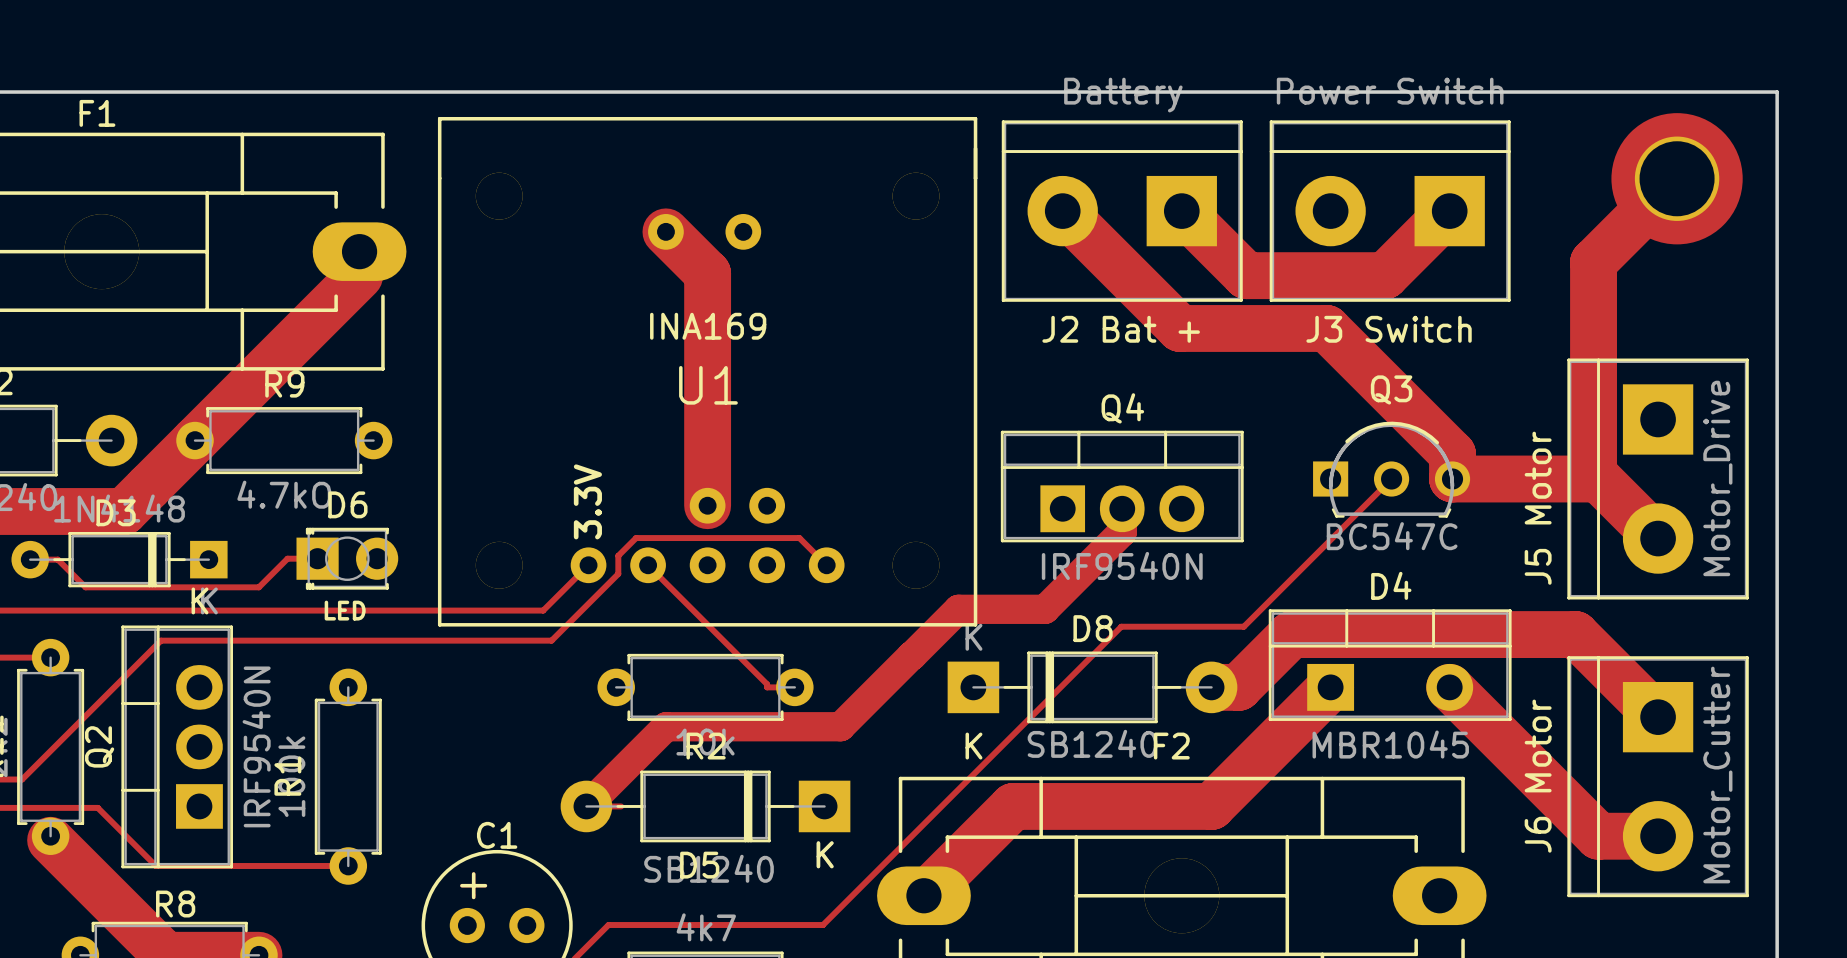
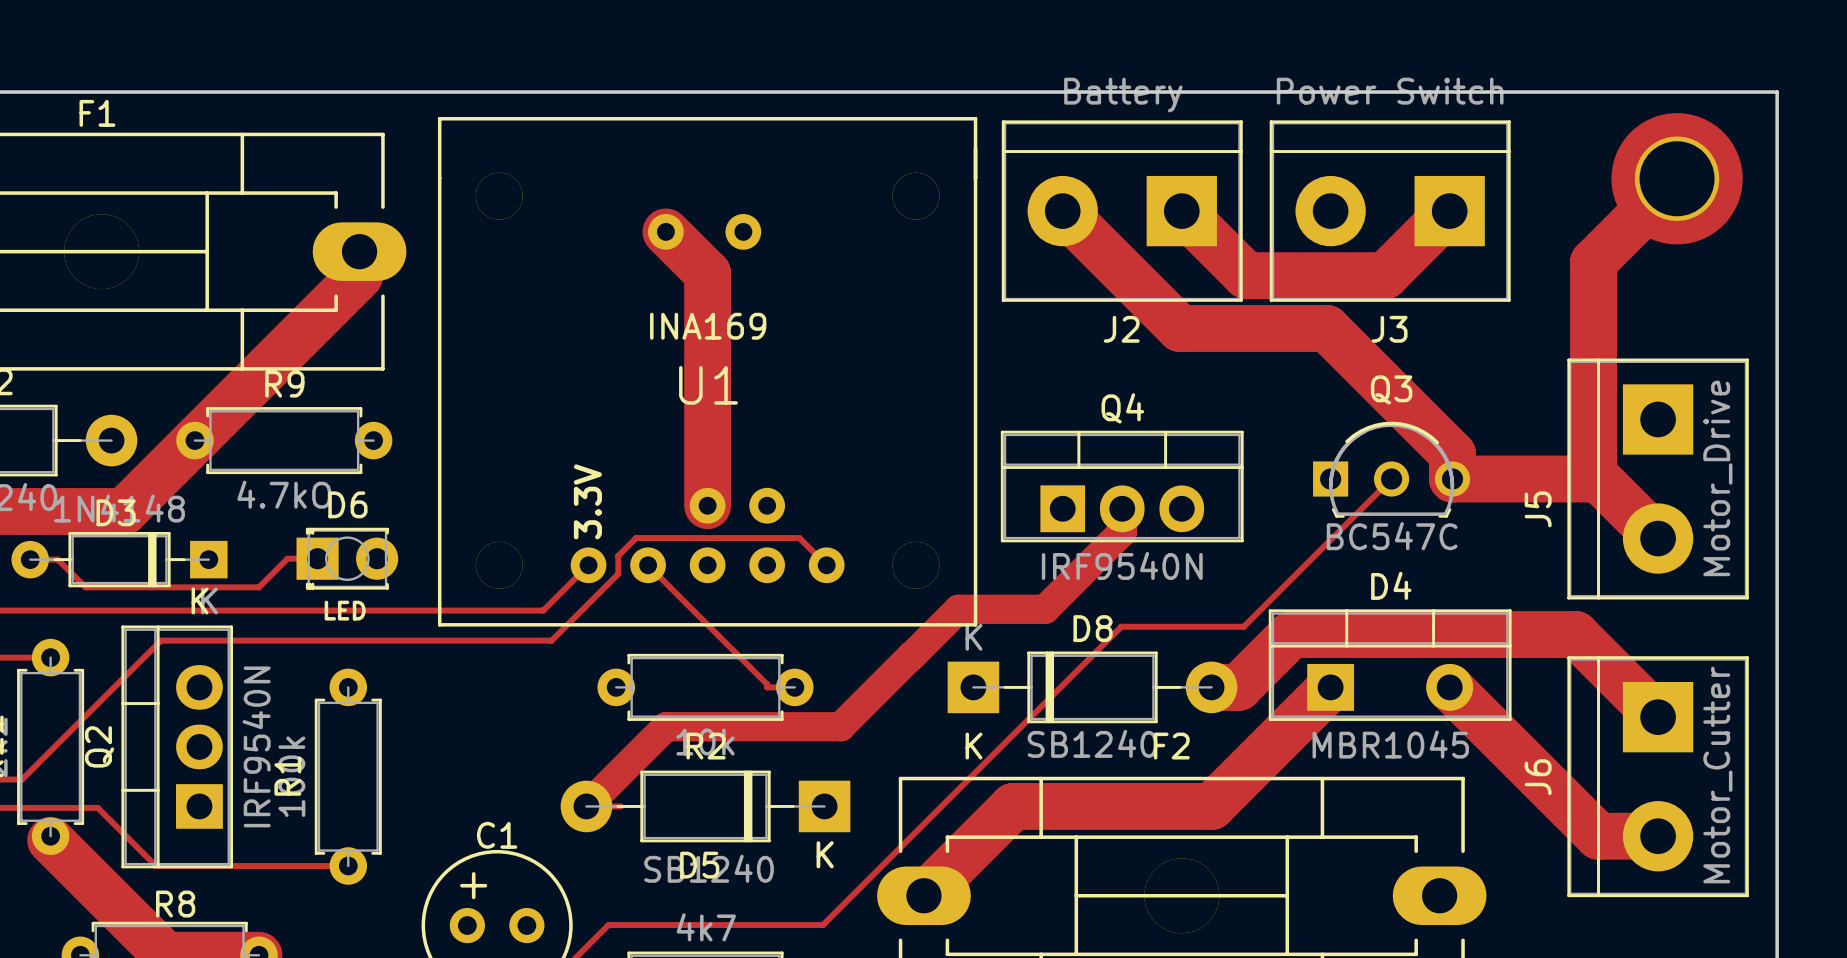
J2 Bat + name: J2 Bat + (1121, 329) -> J2 (1121, 329)
J3 Switch name: J3 Switch (1389, 329) -> J3 (1389, 329)
J5 Motor name: J5 Motor (1538, 508) -> J5 (1538, 509)
J6 Motor name: J6 Motor (1538, 776) -> J6 (1538, 777)

